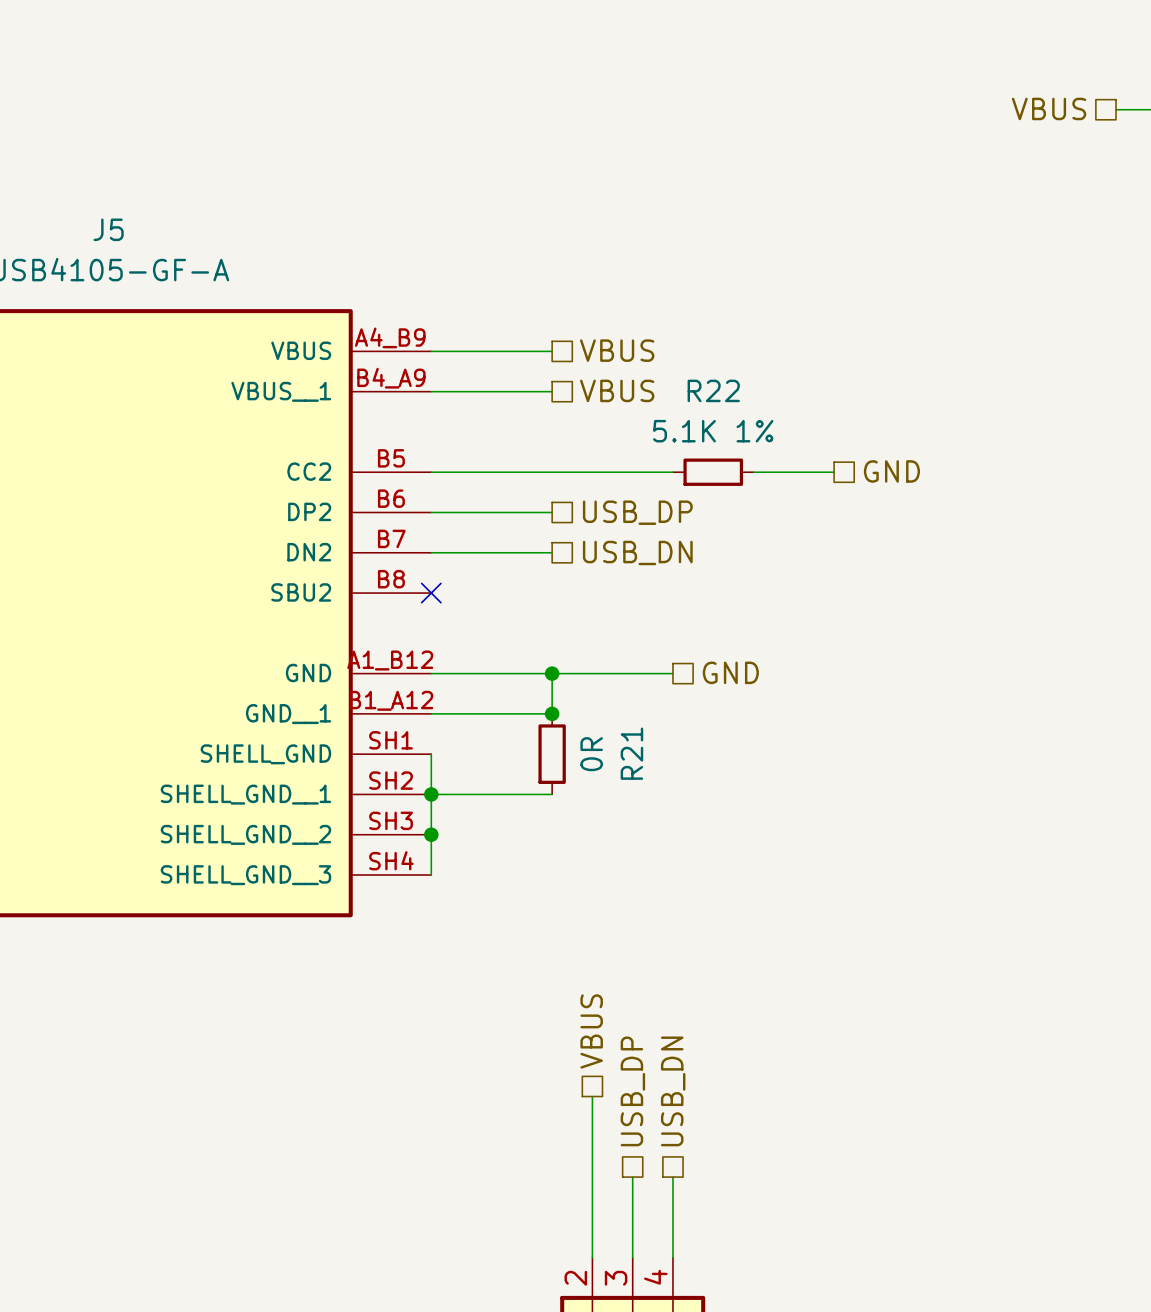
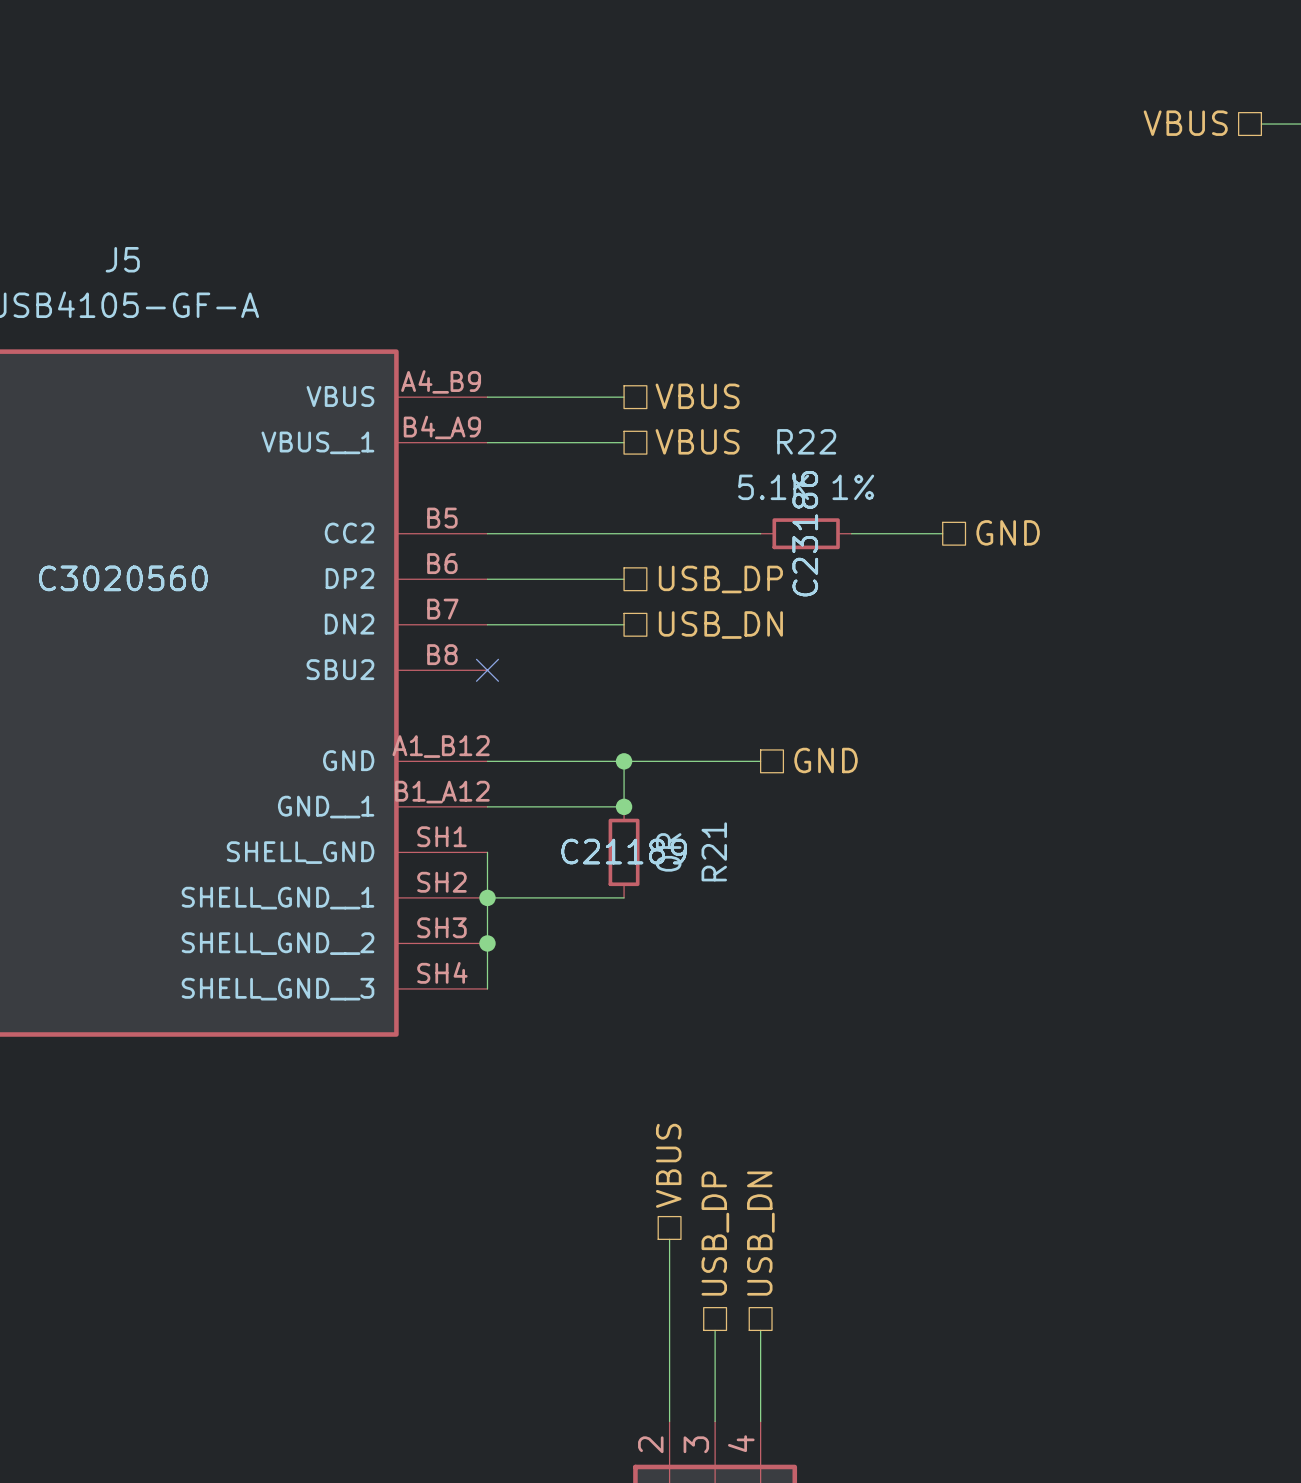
R22 text: none -> C23186 (805, 533)
R22 text: none -> C23186 (805, 533)
J5 text: none -> C3020560 (123, 578)
J5 text: none -> C3020560 (123, 578)
R21 text: none -> C21189 (624, 851)
R21 text: none -> C21189 (624, 851)

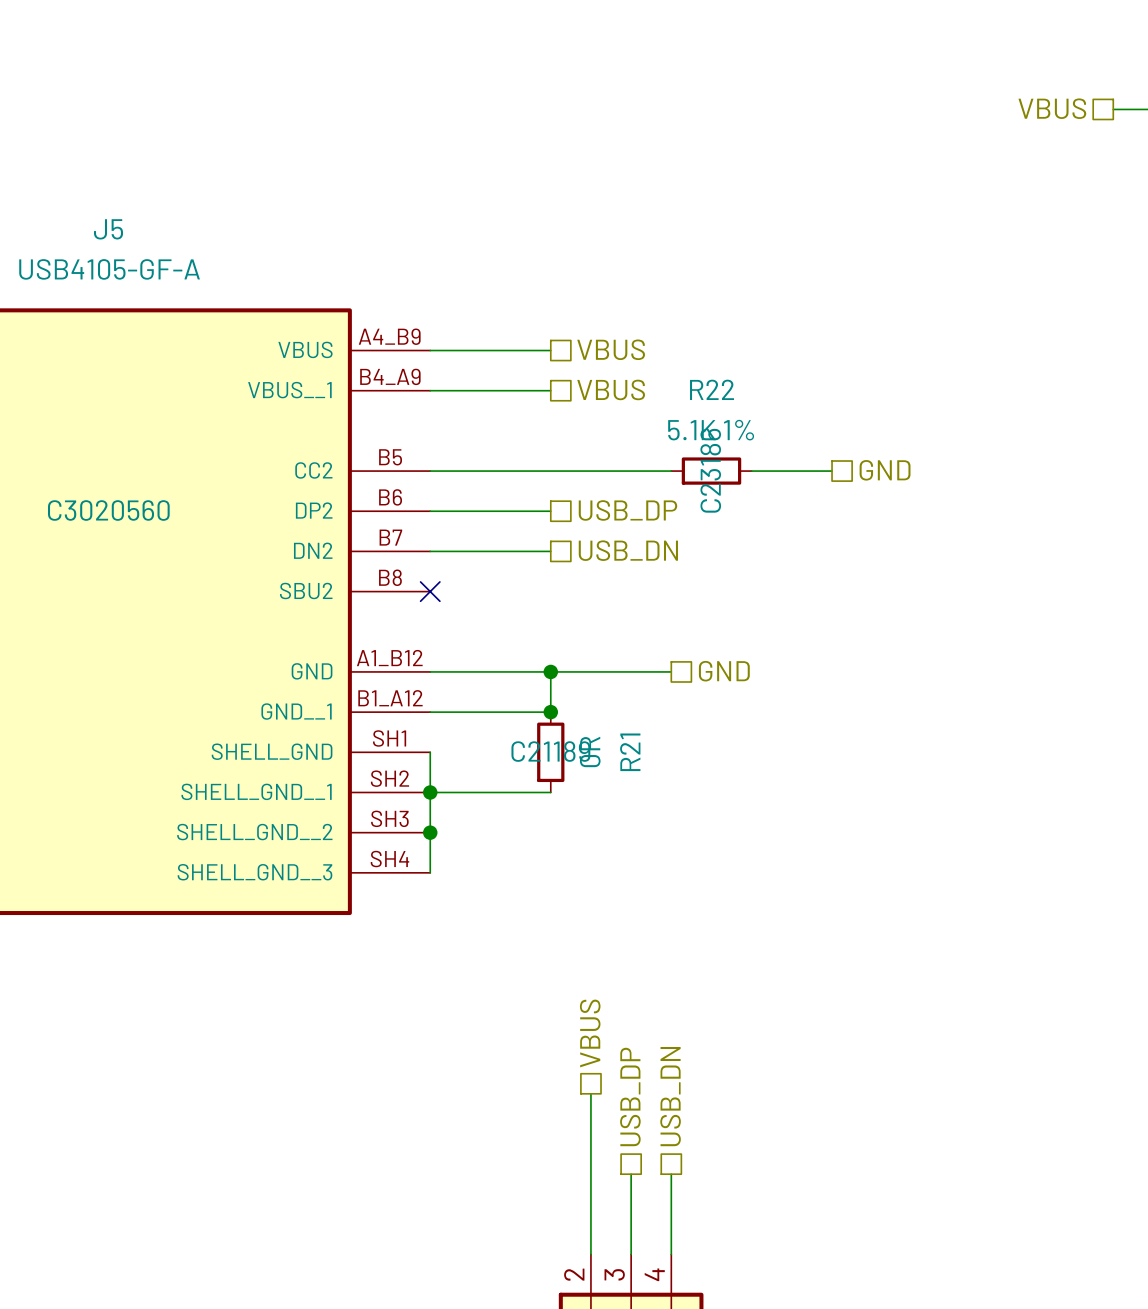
R22 text: C23186 (805, 533) -> none
J5 text: C3020560 (123, 578) -> none
R21 text: C21189 (624, 851) -> none

